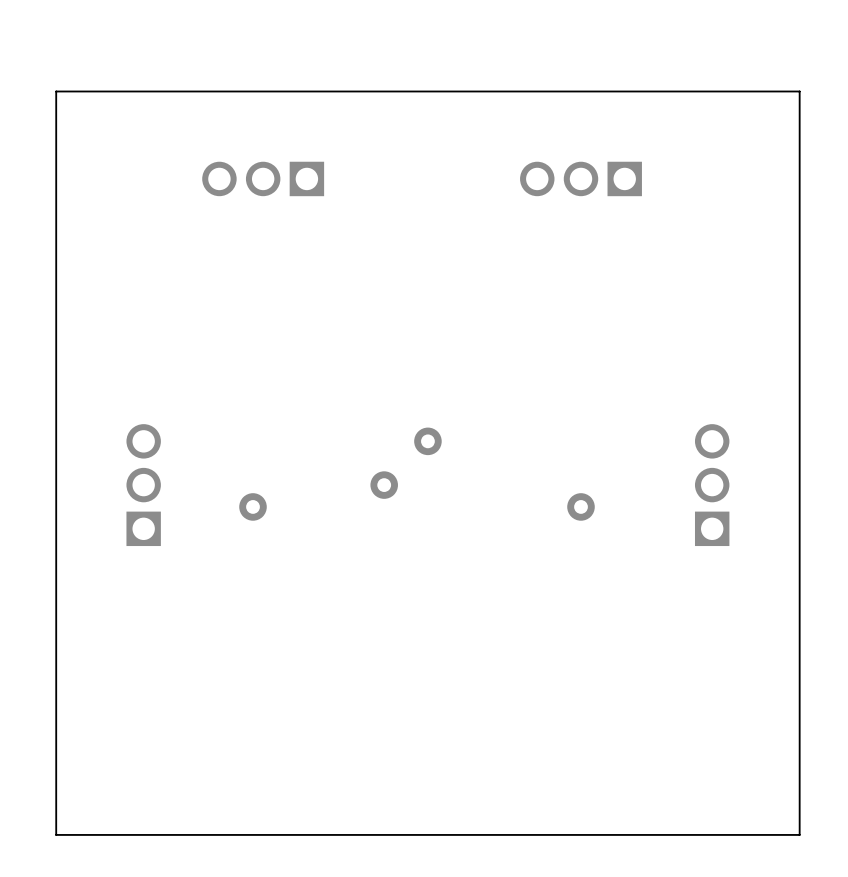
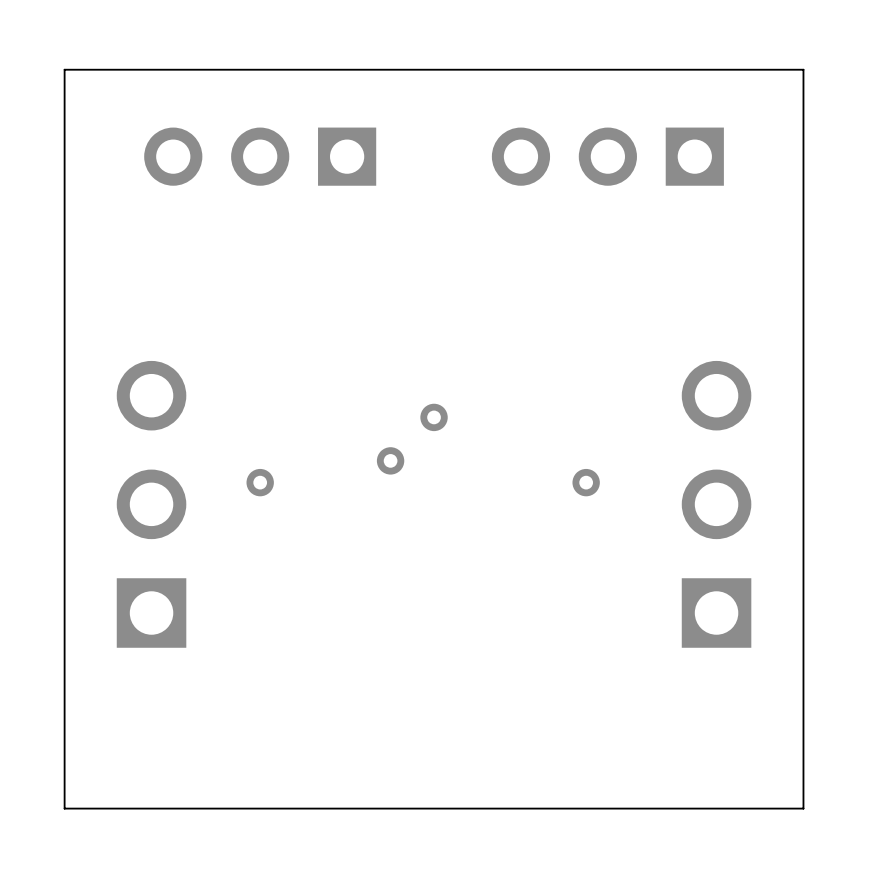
part footprint: [202, 161, 325, 197] -> [144, 127, 377, 186]
part footprint: [520, 161, 642, 197] -> [491, 127, 724, 186]
part: (143, 485) -> none
part: (712, 485) -> none
part: none -> (151, 504)
part: none -> (716, 504)

